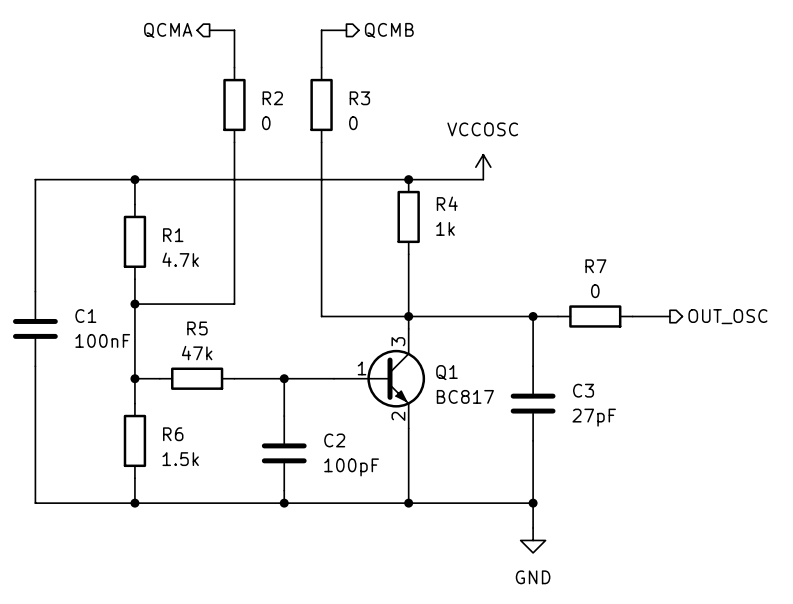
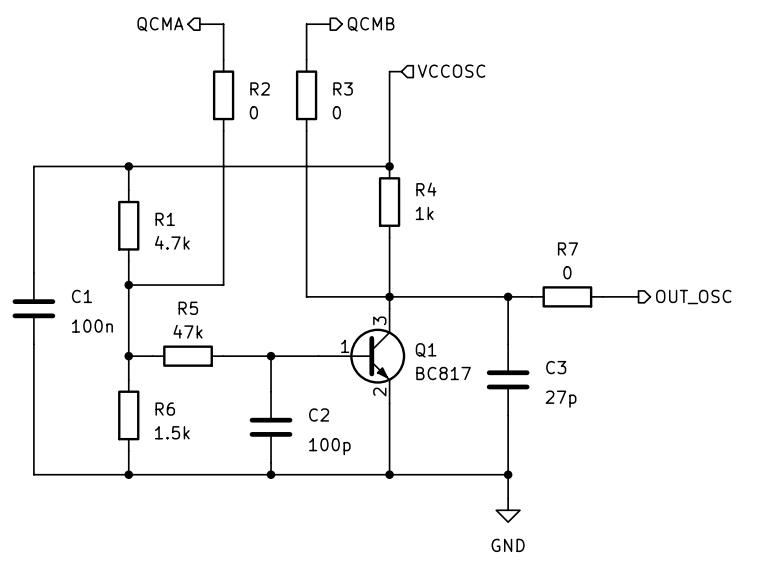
hierarchical label: none -> VCCOSC (451, 71)
power symbol: VCCOSC (483, 167) -> none
wire: (408, 179) (483, 179) -> (389, 166) (389, 71) (401, 71)
C1 value: 100nF (102, 340) -> 100n (92, 326)
C3 value: 27pF (594, 417) -> 27p (561, 399)
C2 value: 100pF (351, 467) -> 100p (329, 446)

